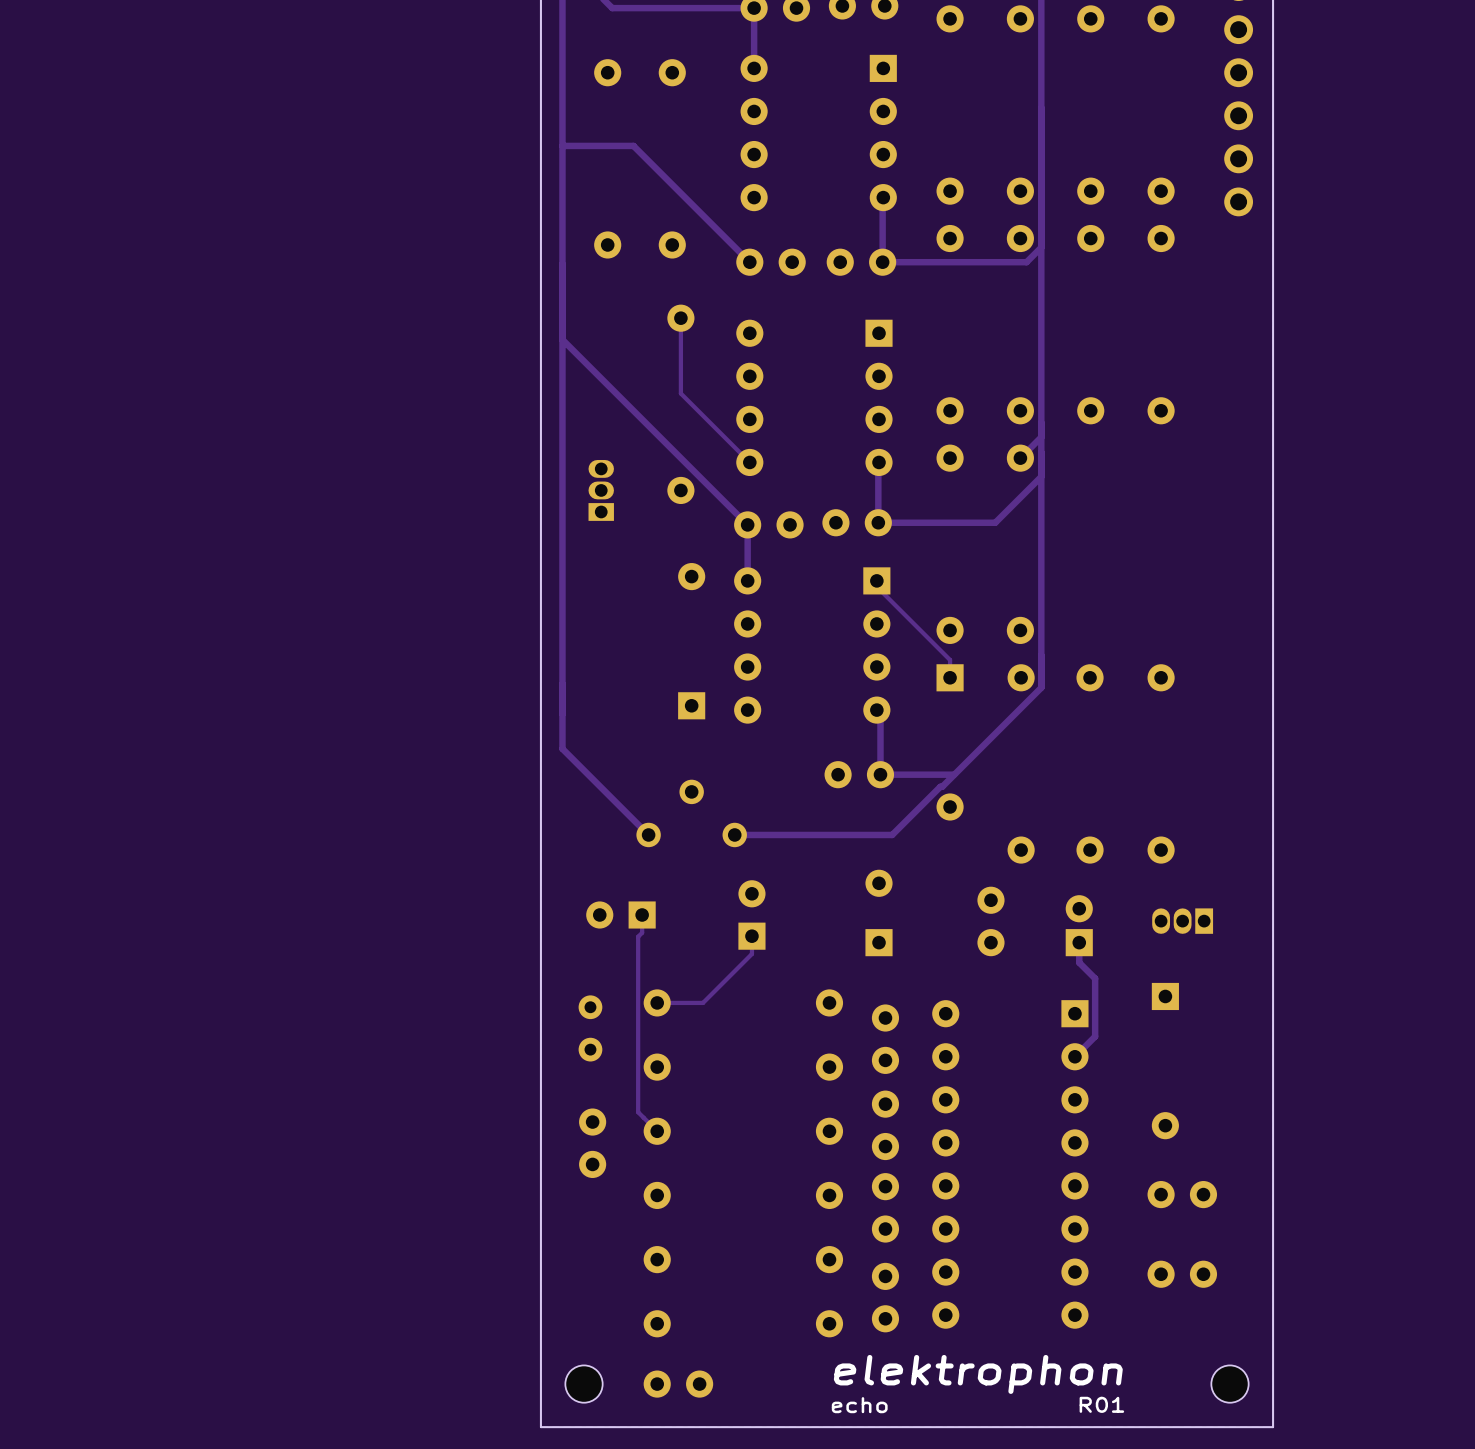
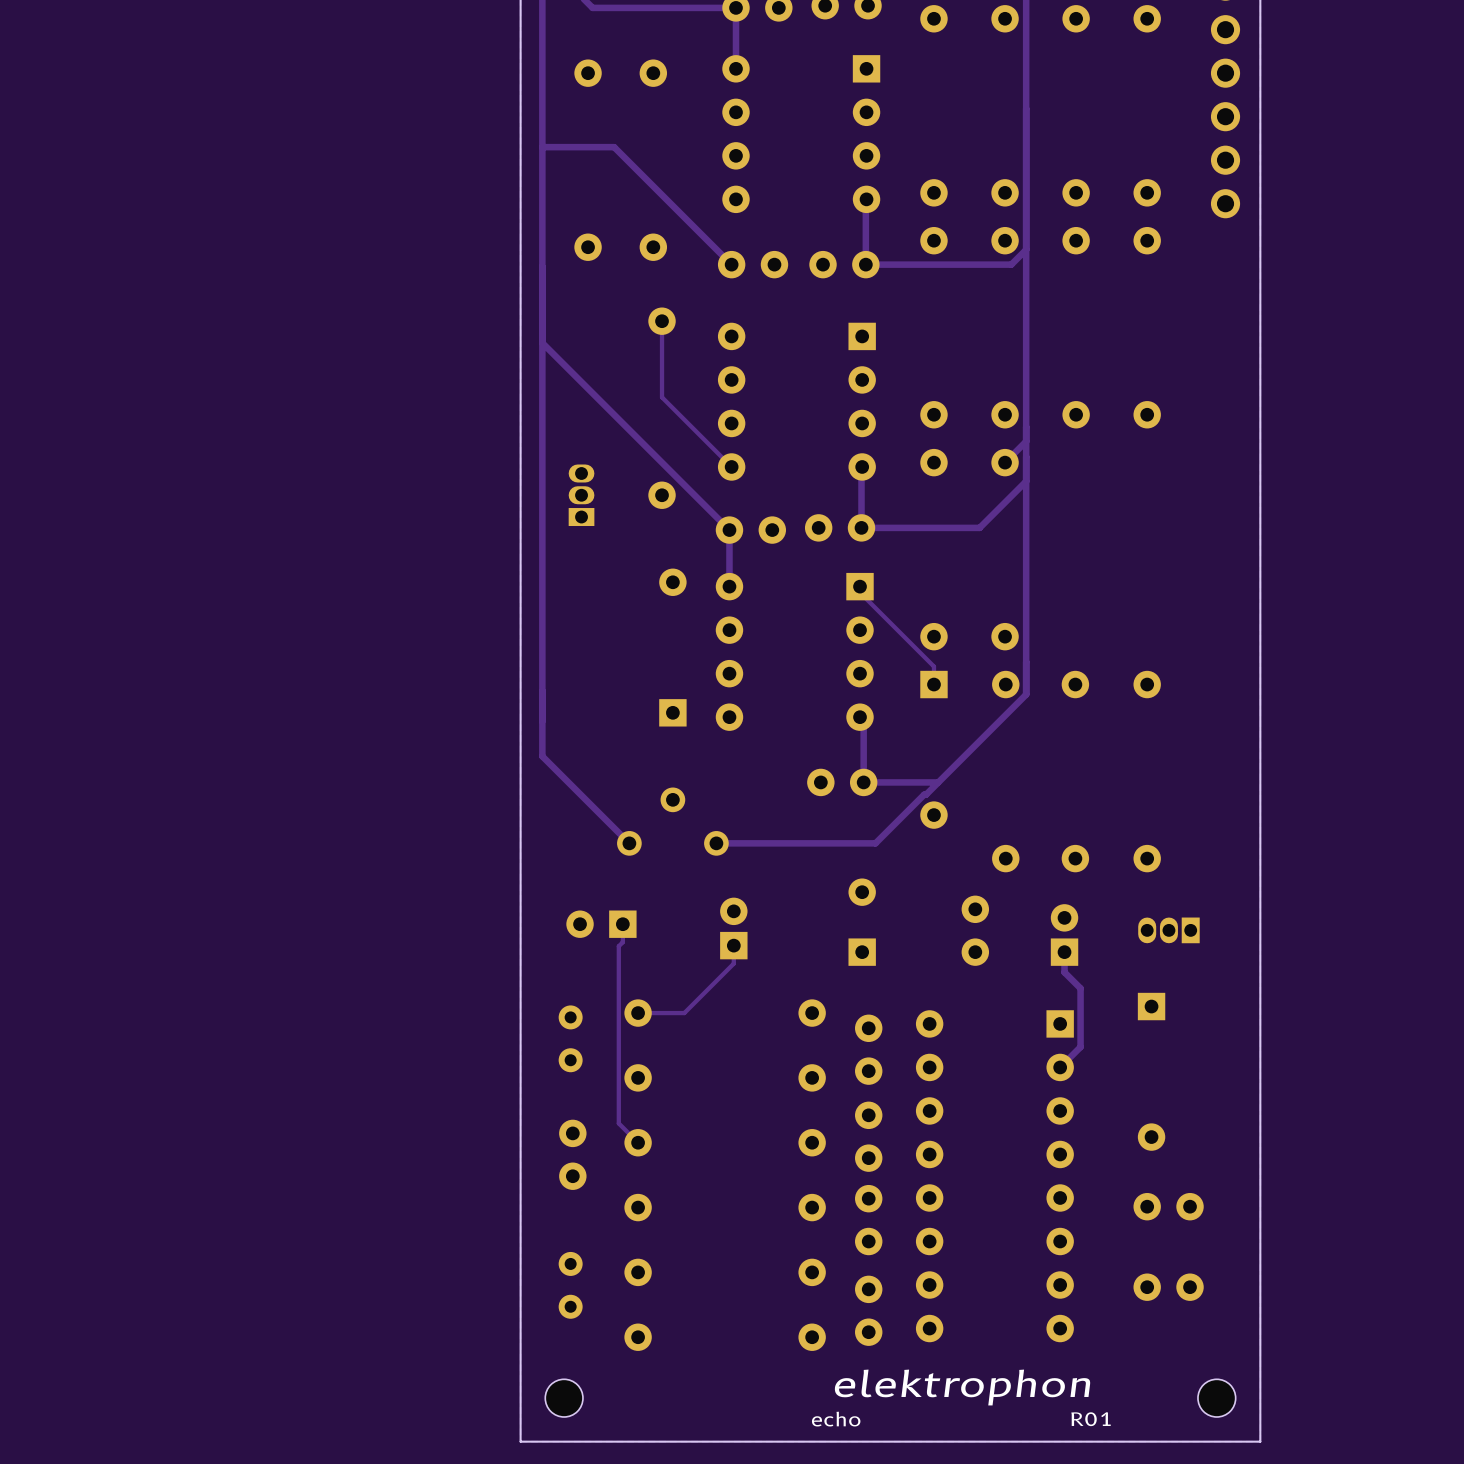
part footprint: [738, 880, 766, 950] -> [720, 897, 748, 960]
part: none -> (570, 1285)
part: (678, 1384) -> none

